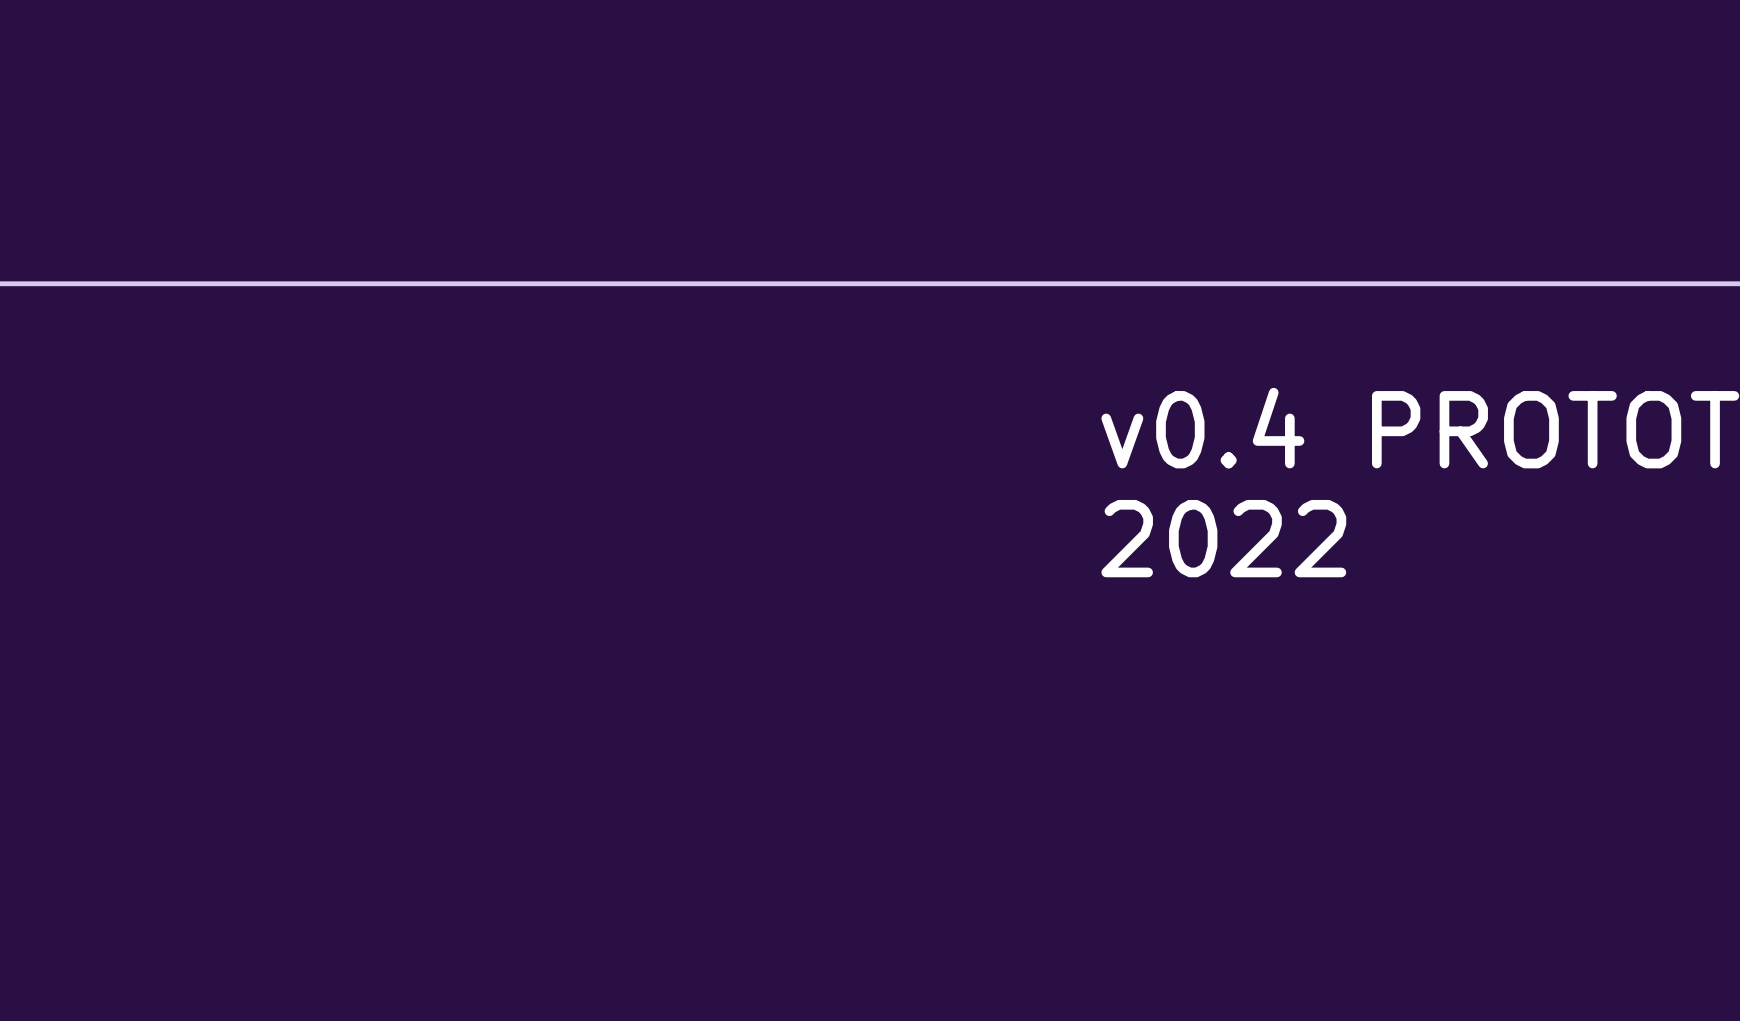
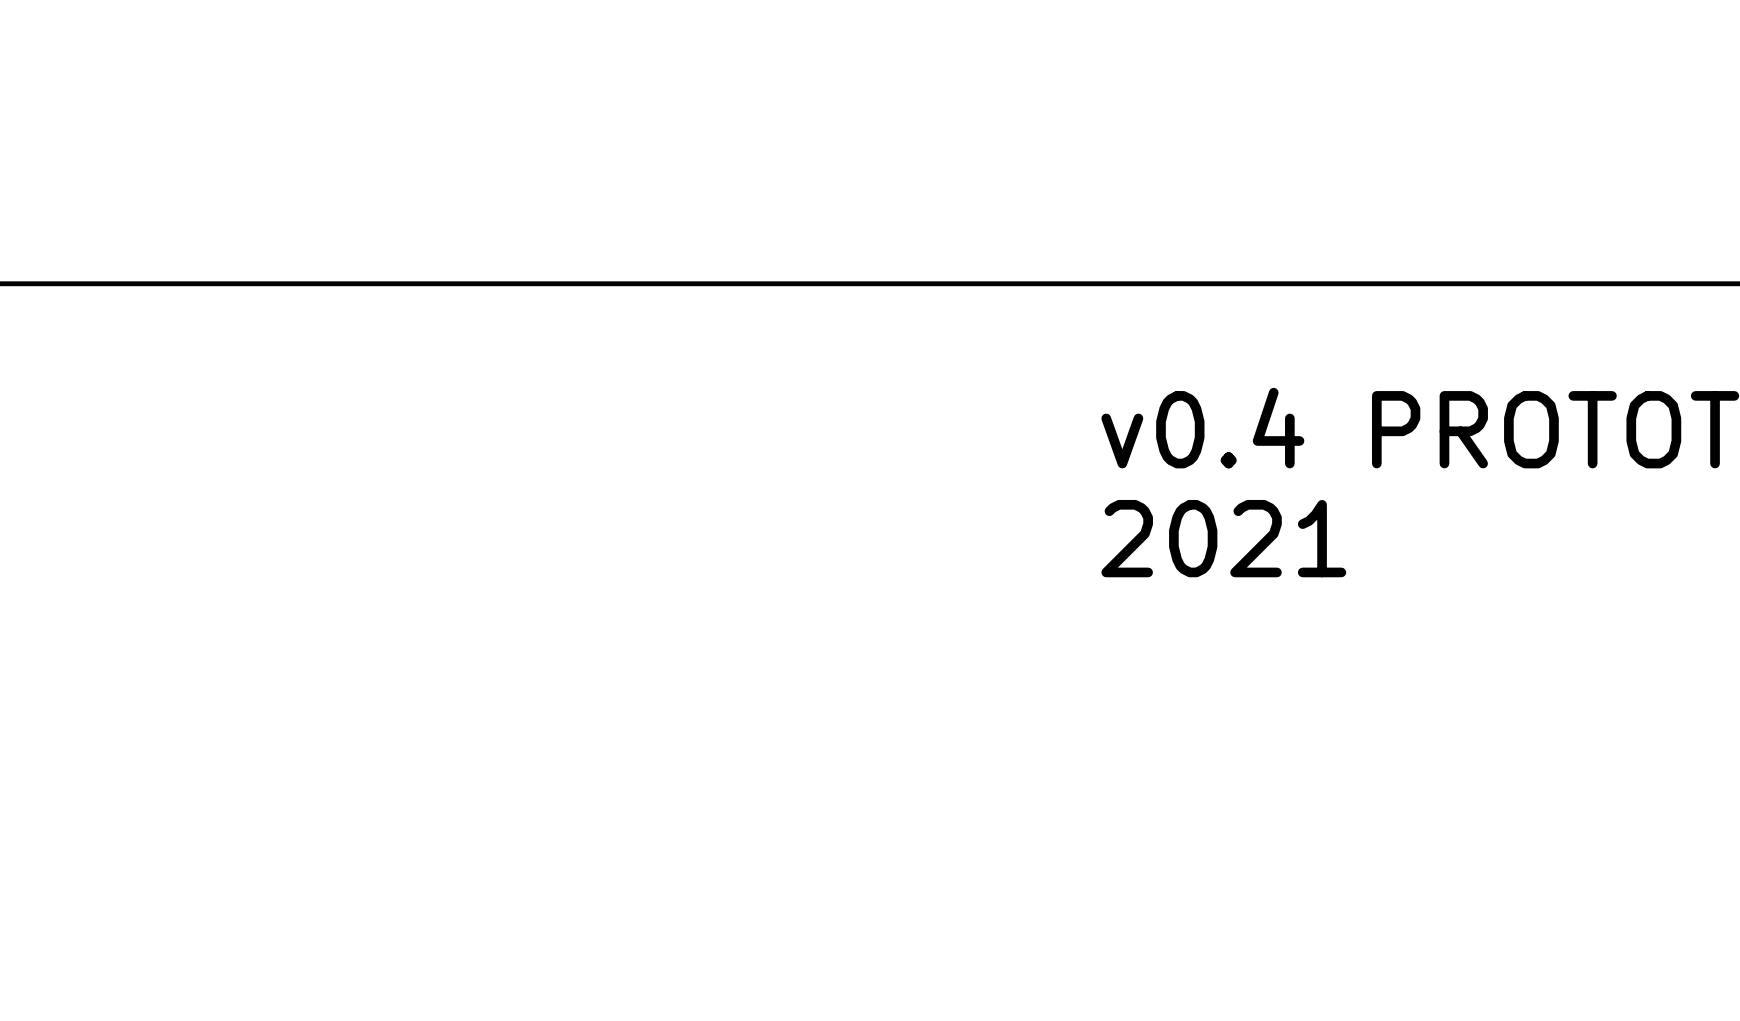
text: 2022 (1223, 538) -> 2021 (1223, 538)

